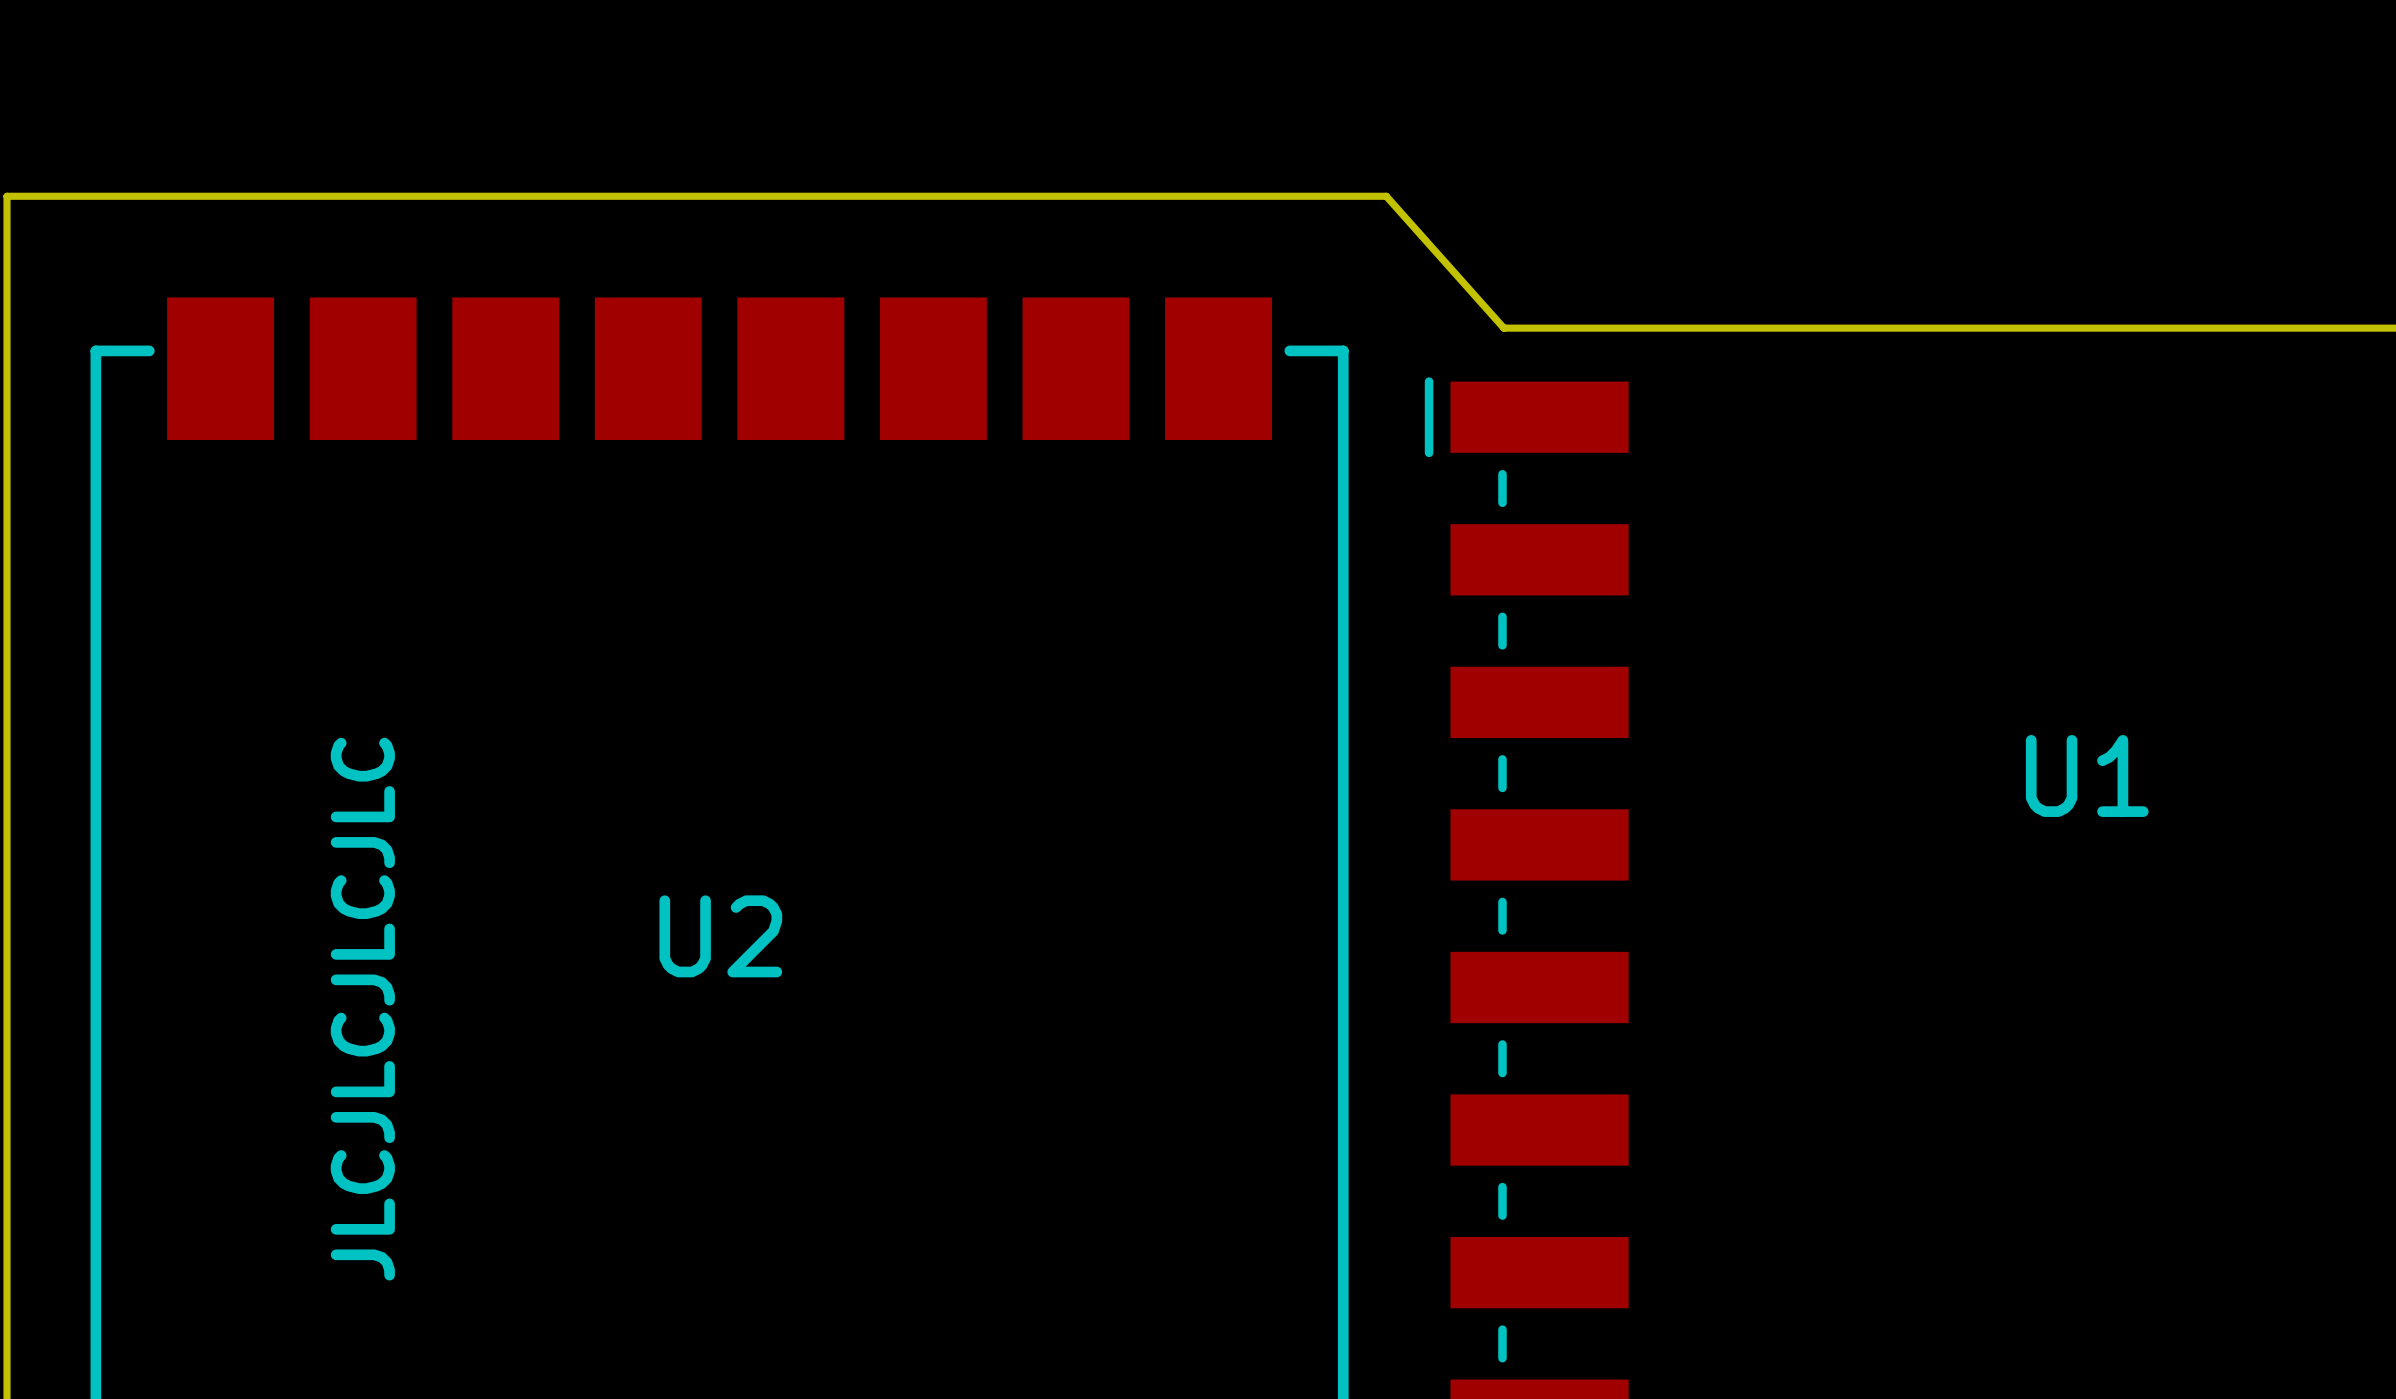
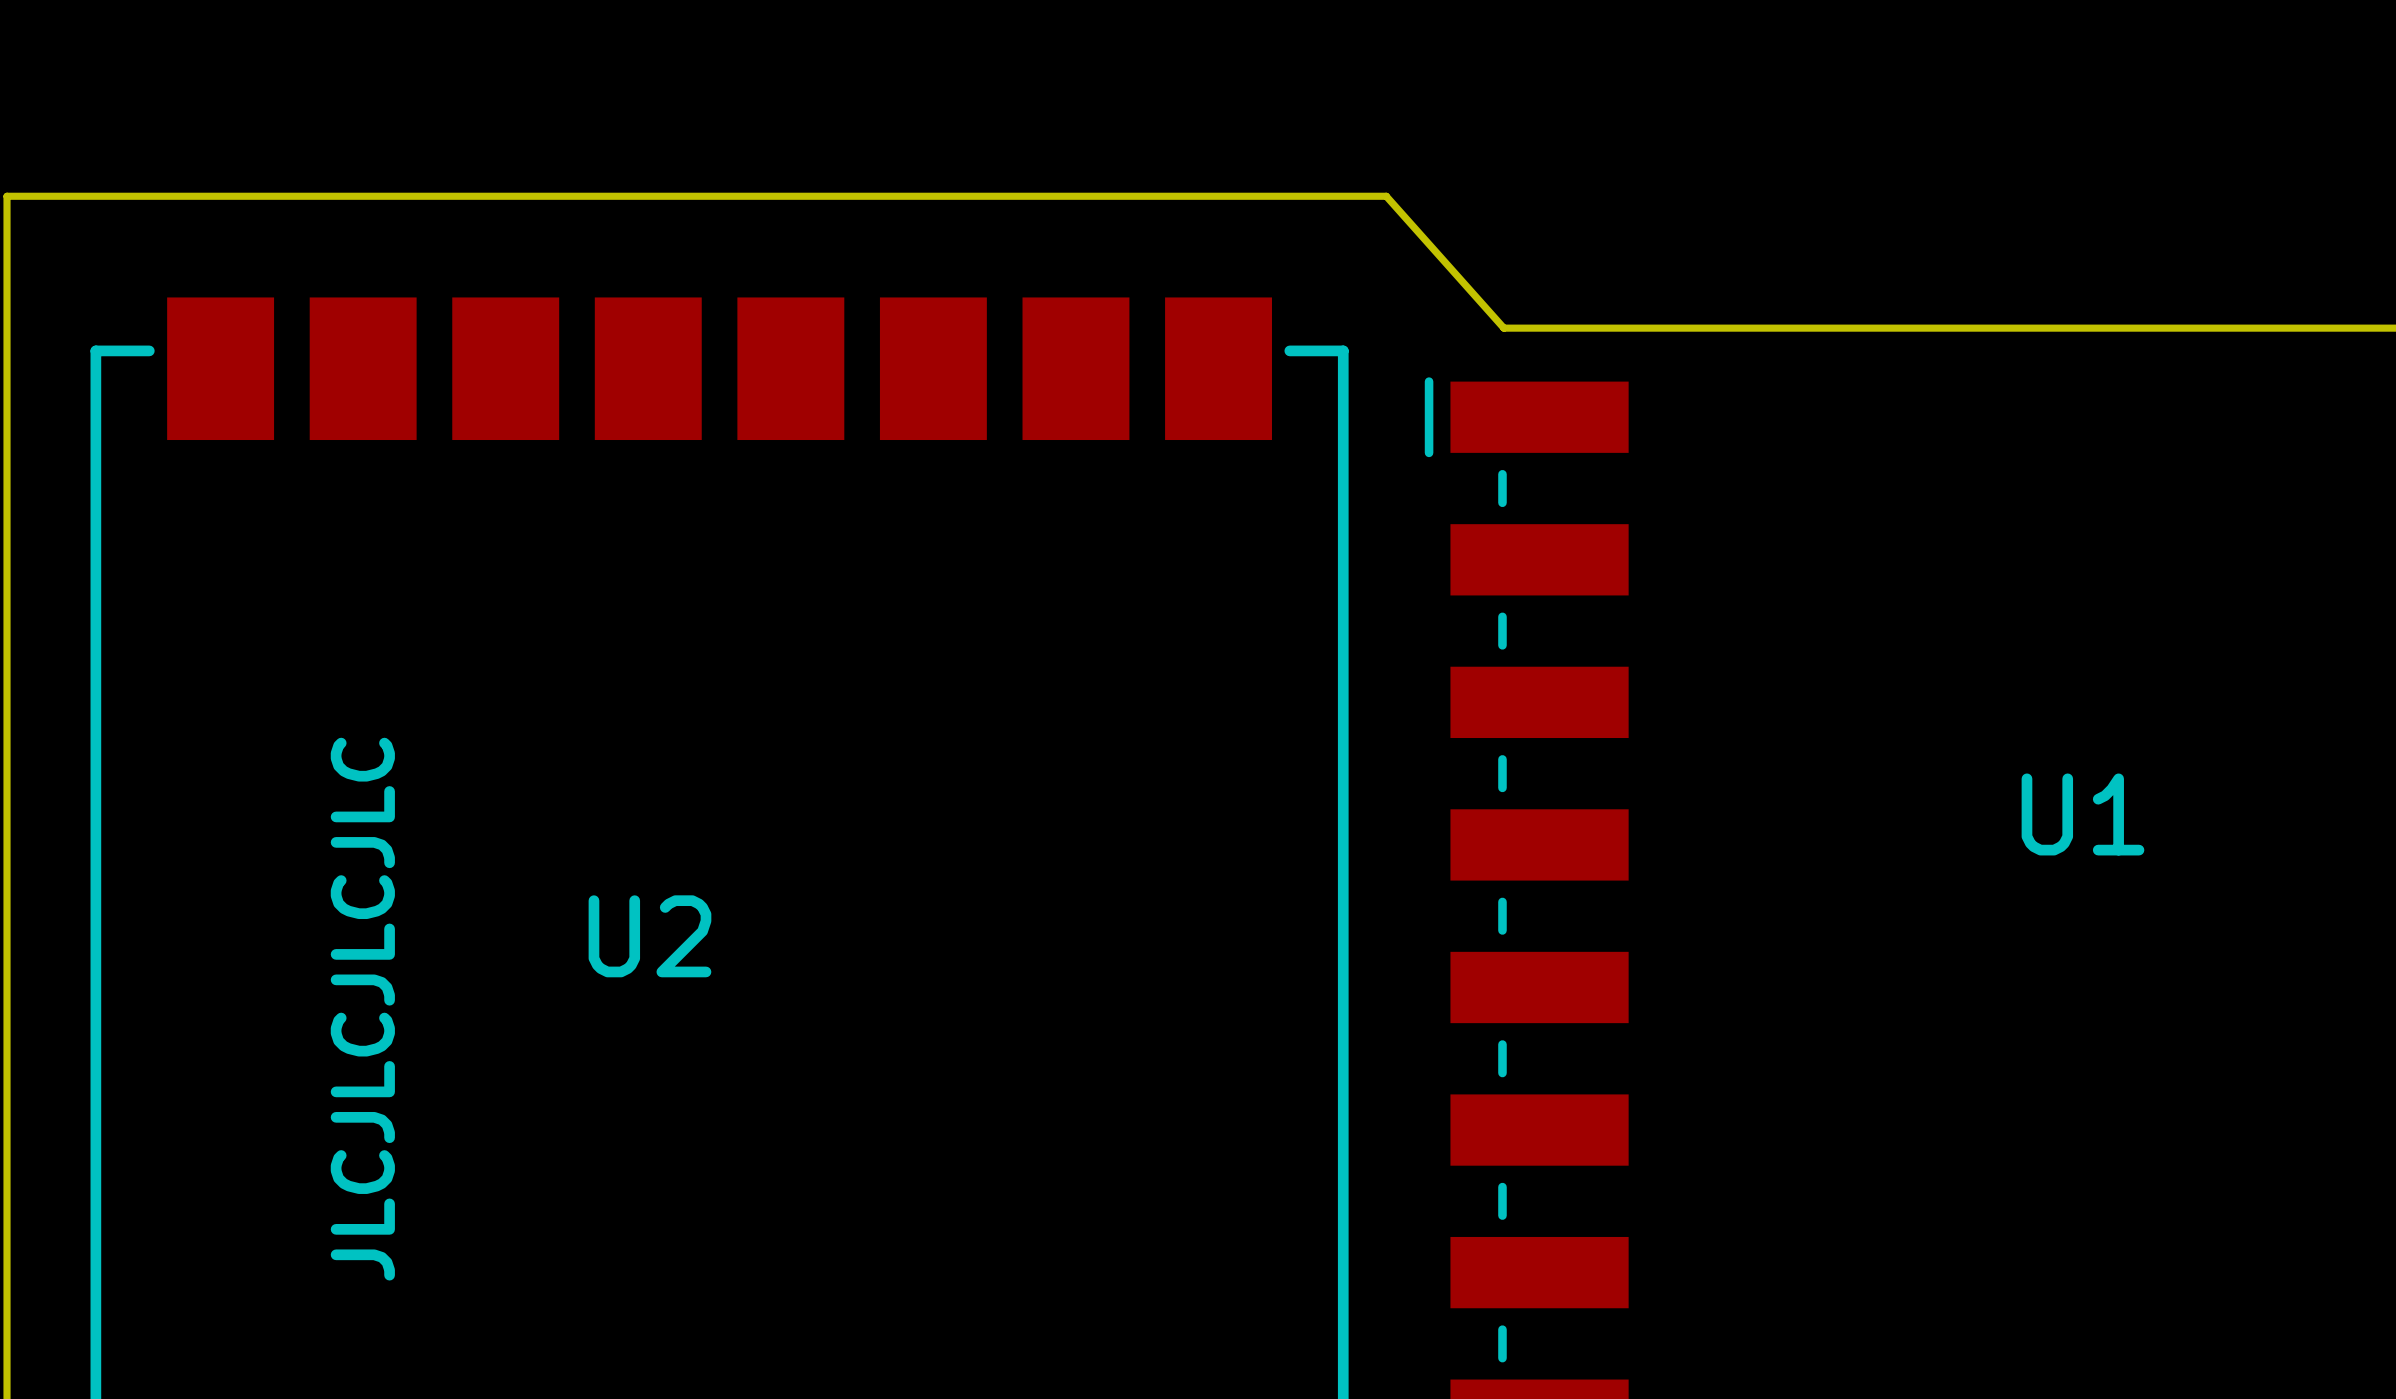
U1 name position: U1 (2087, 775) -> U1 (2082, 814)
U2 name position: U2 (720, 936) -> U2 (649, 936)

